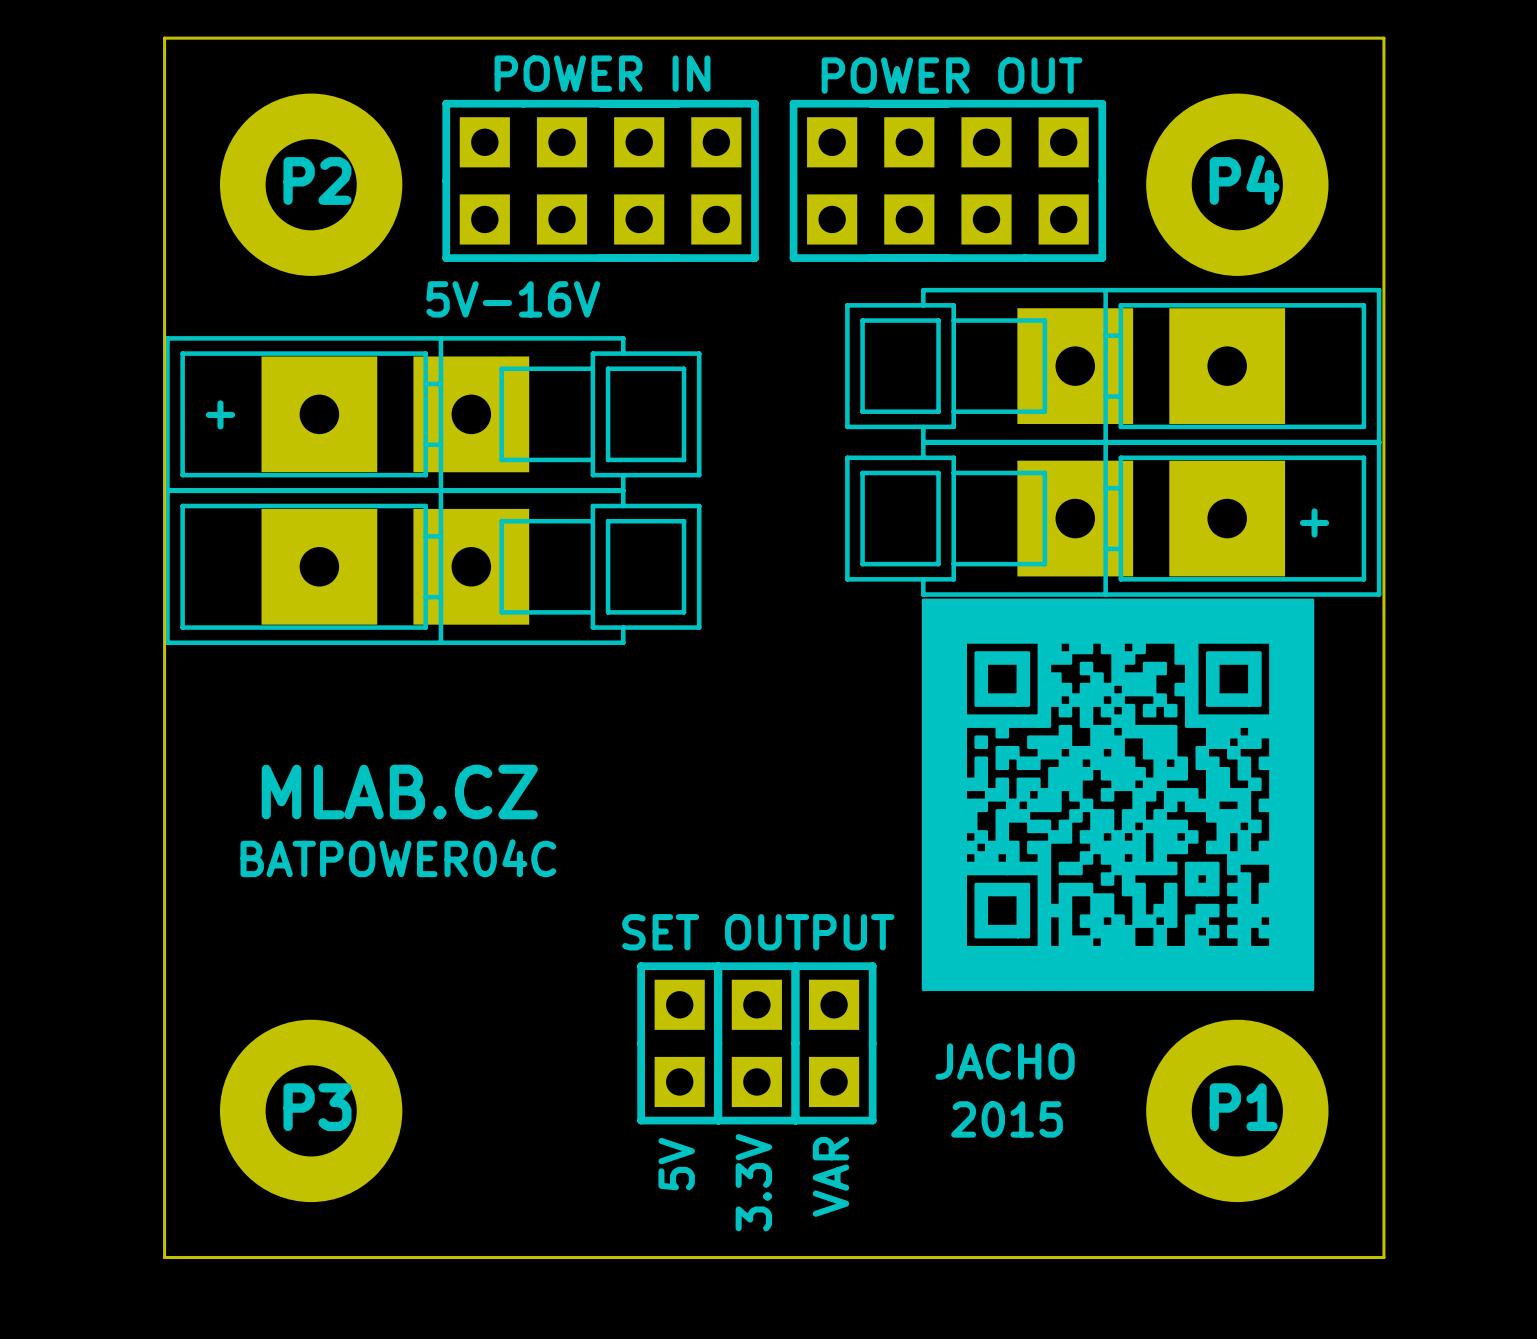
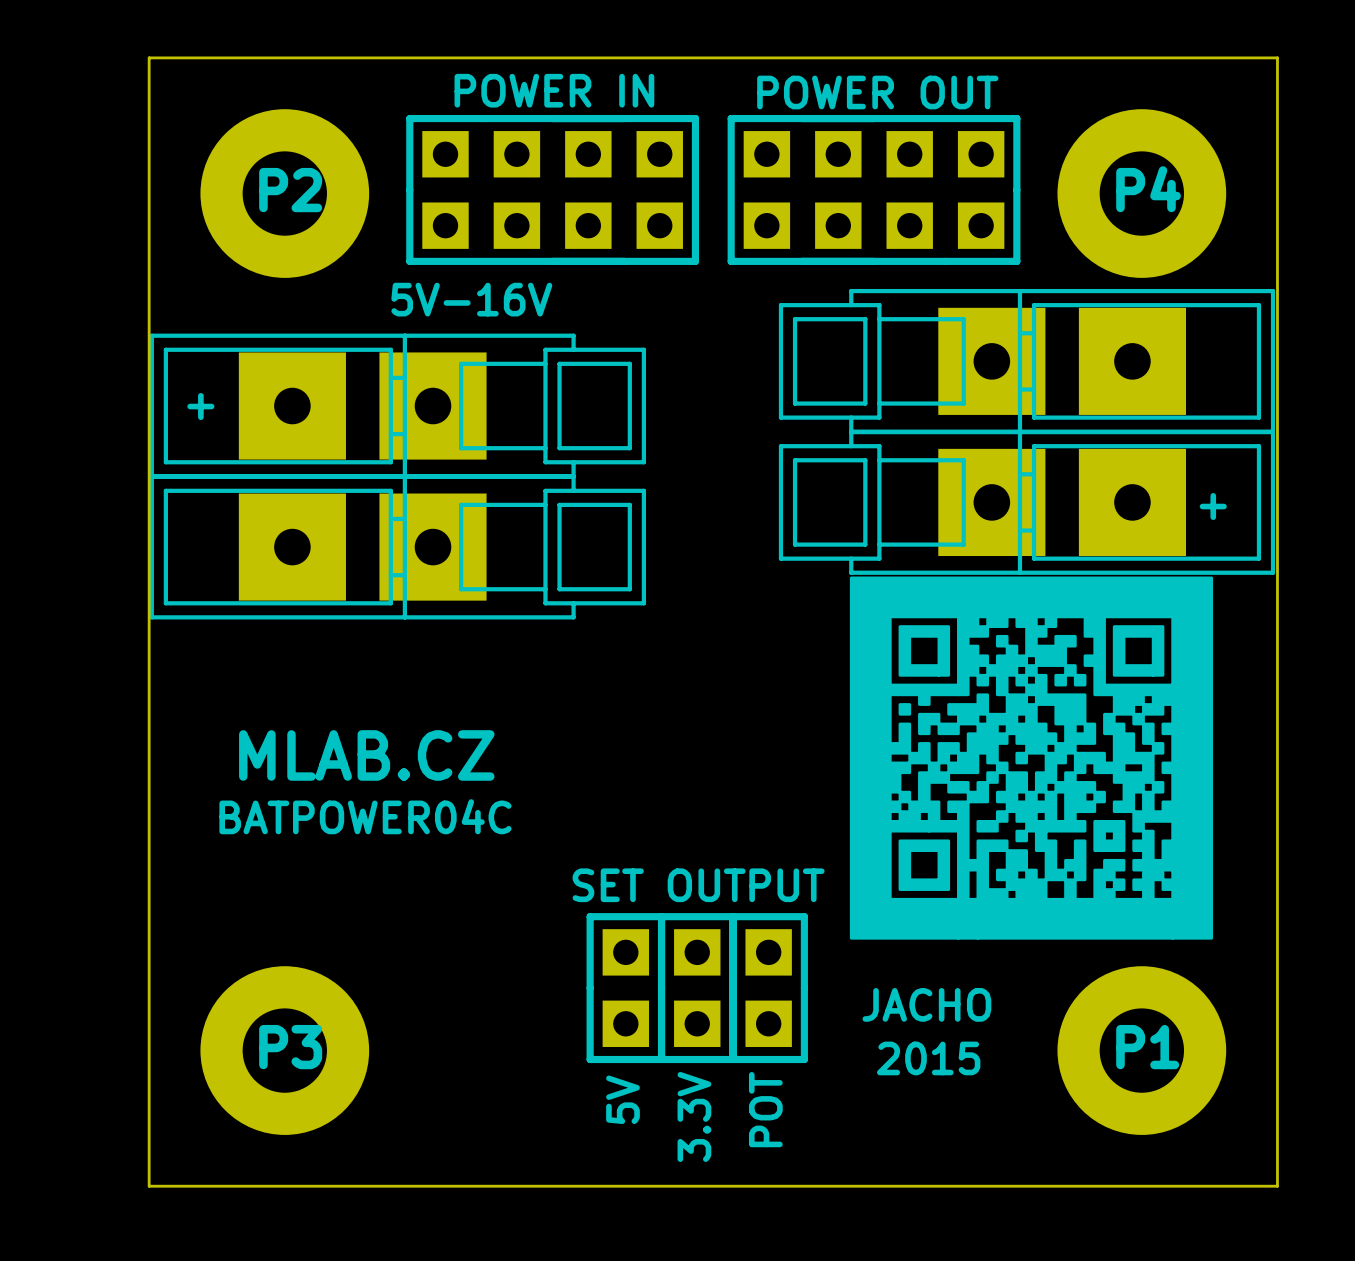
text: VAR (831, 1176) -> POT (765, 1109)

